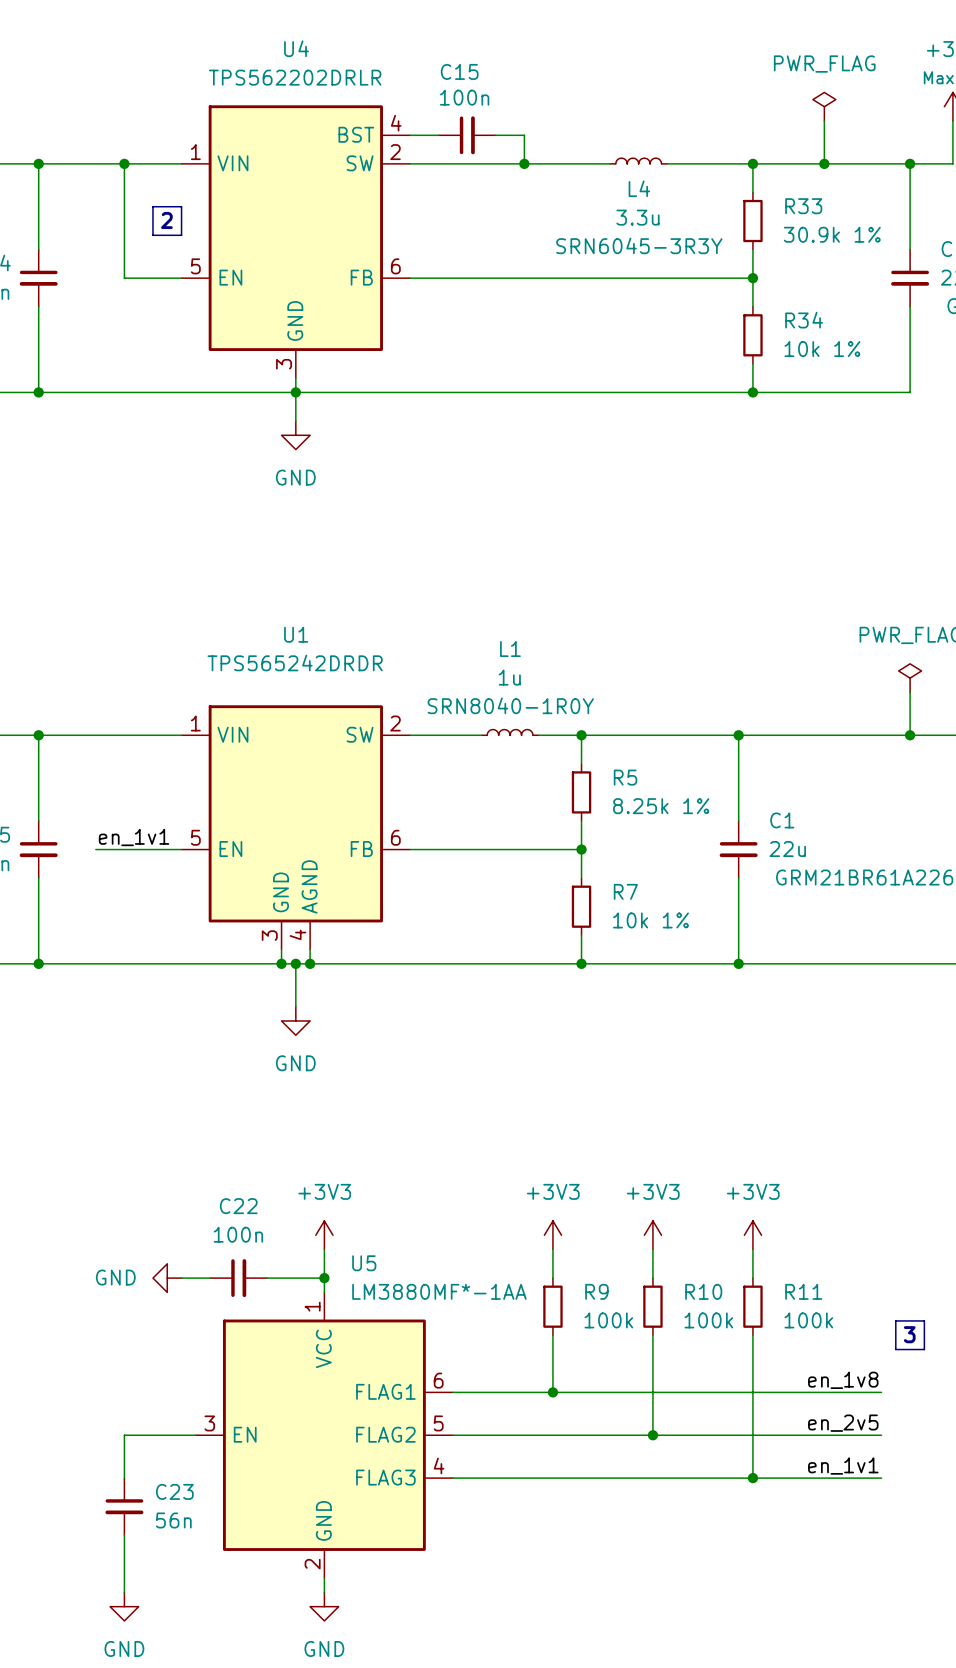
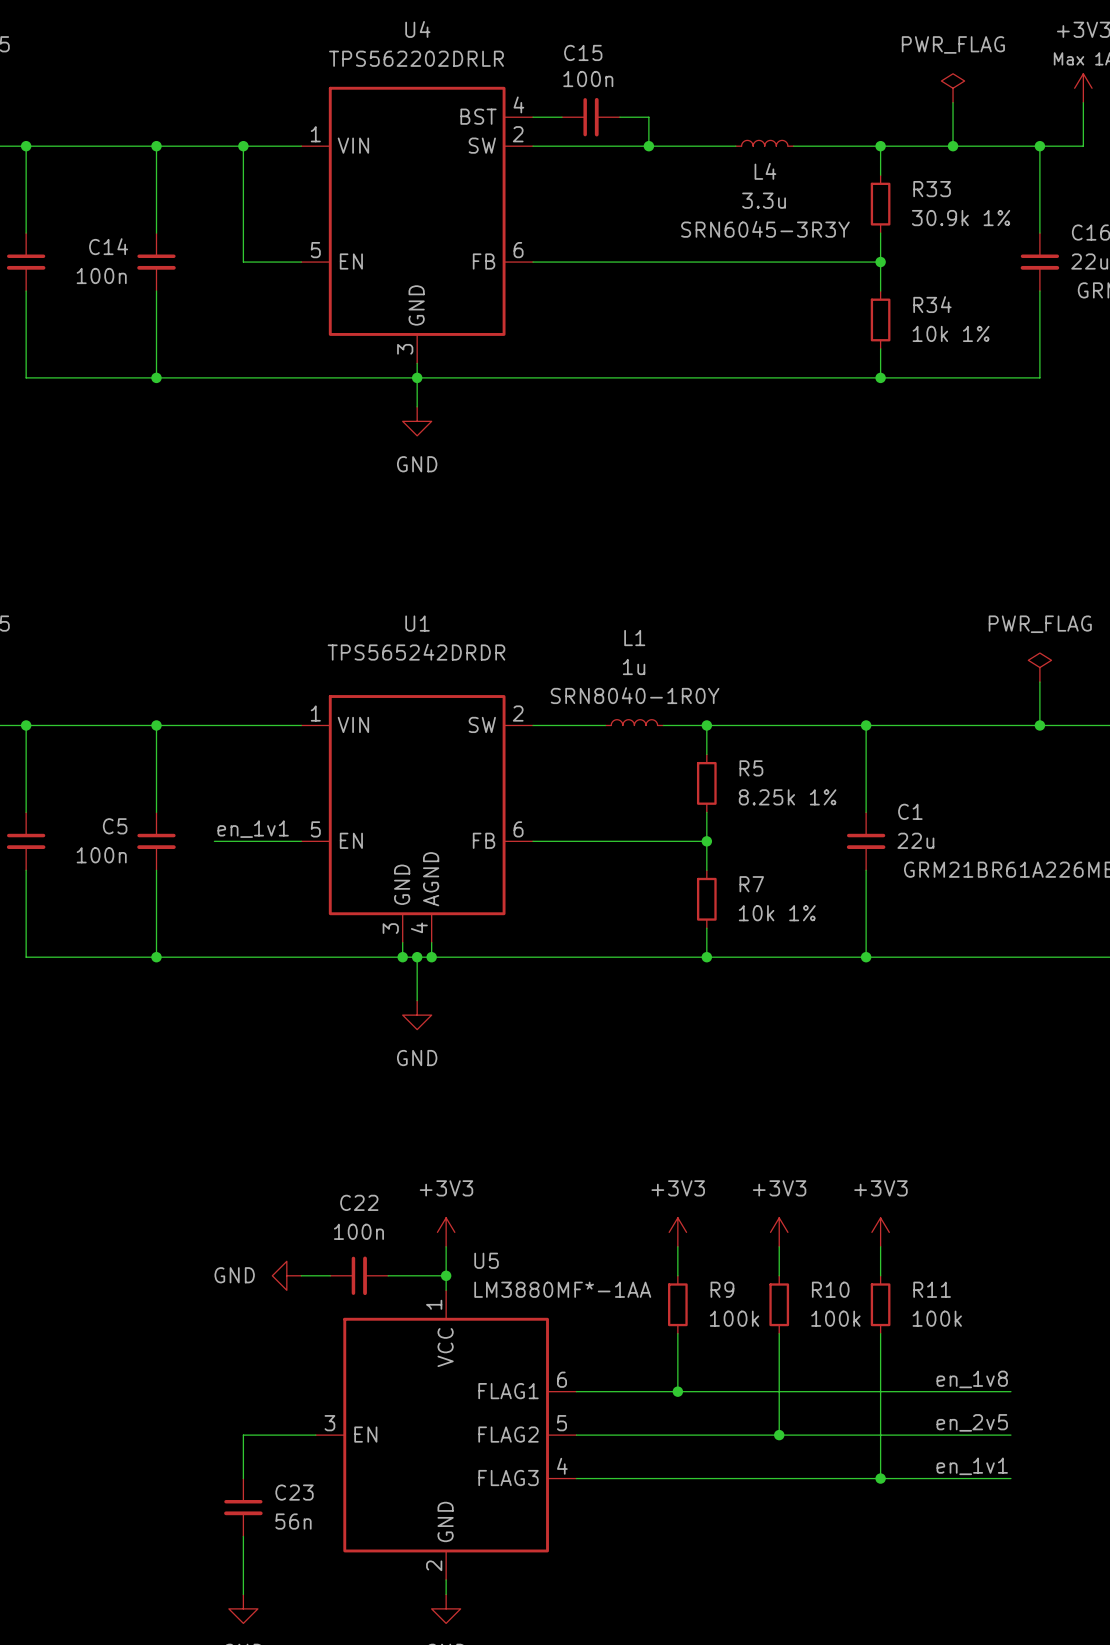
line: (152, 206) (181, 206) (181, 235) (152, 235) (152, 206) -> none
text: 2 (166, 220) -> none
line: (895, 1320) (924, 1320) (924, 1349) (895, 1349) (895, 1320) -> none
text: 3 (909, 1334) -> none

